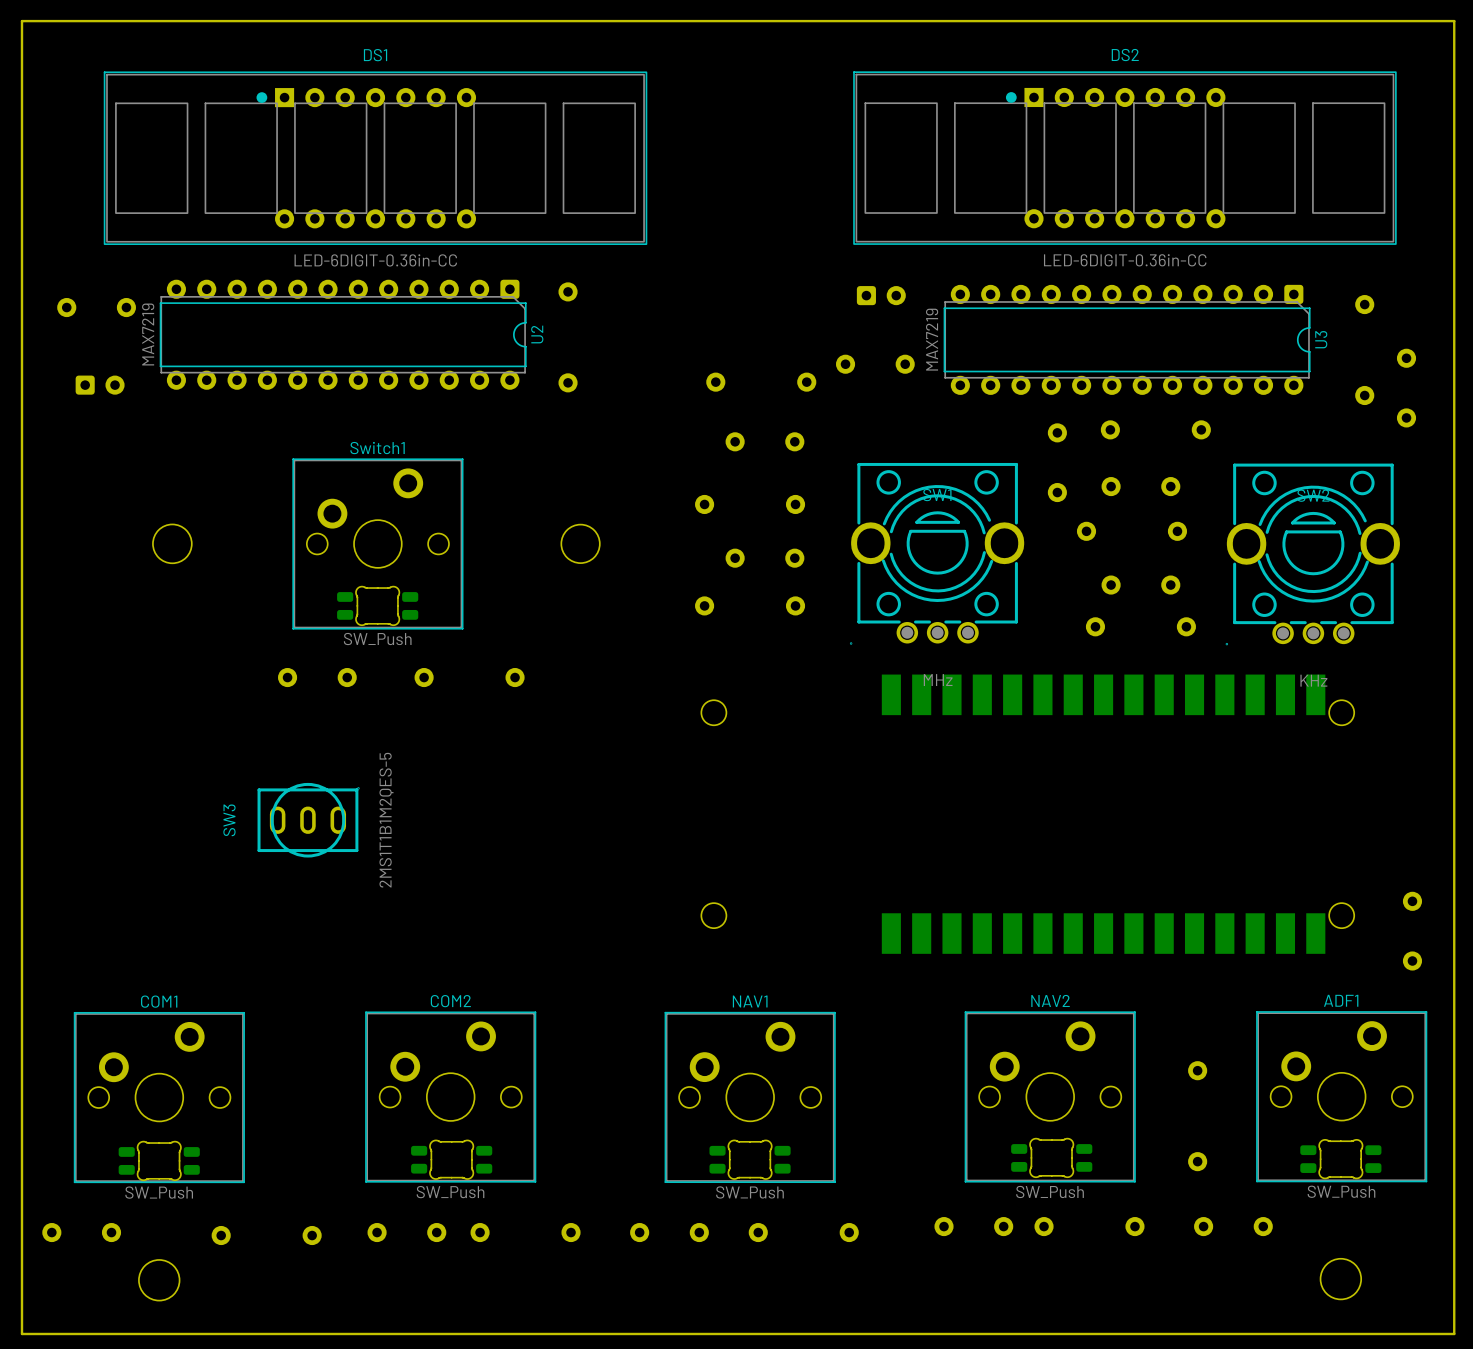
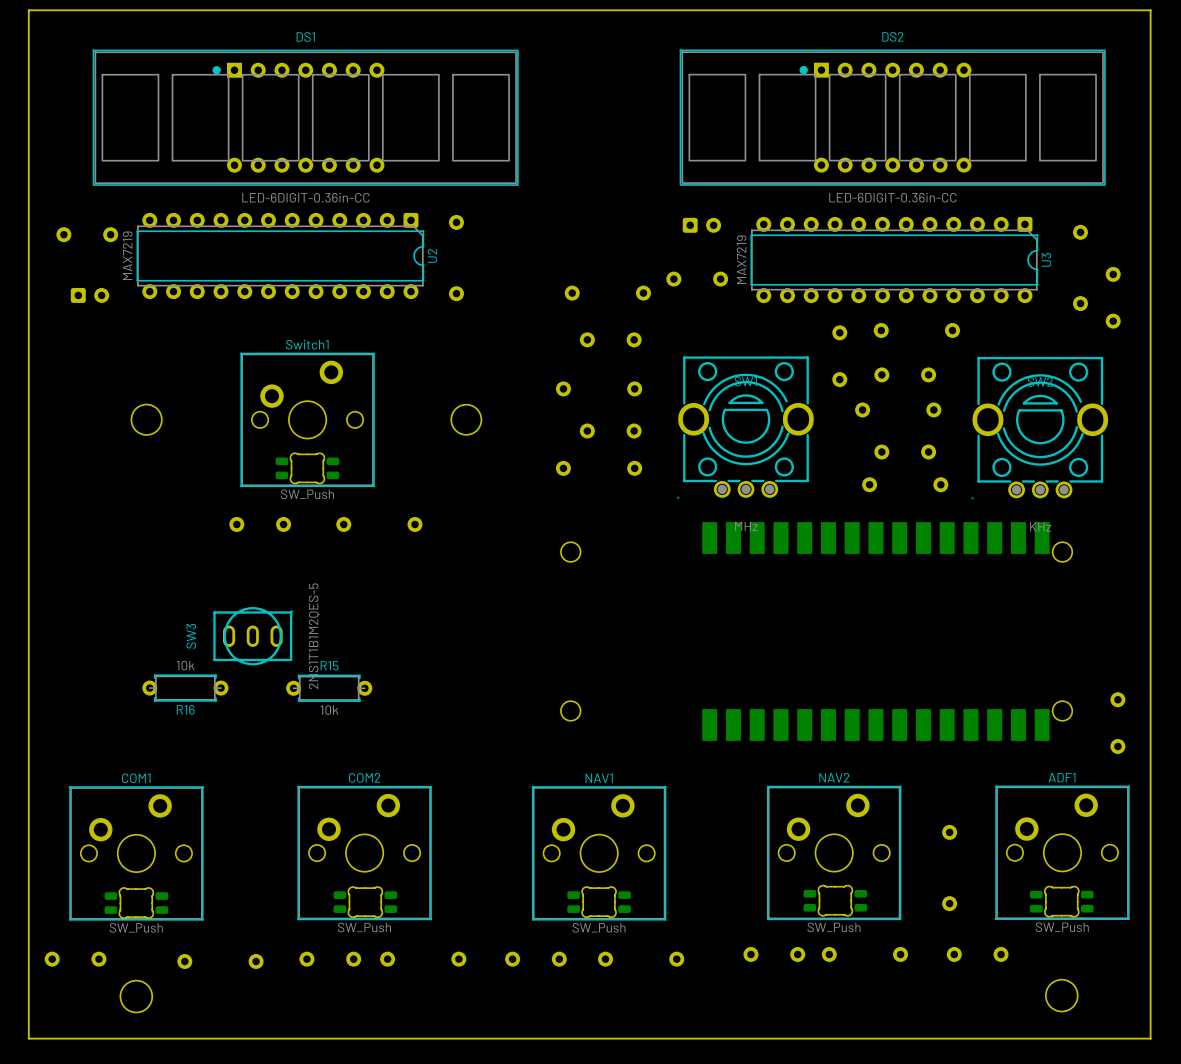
R16: none -> 10k (185, 688)
R15: none -> 10k (329, 688)

